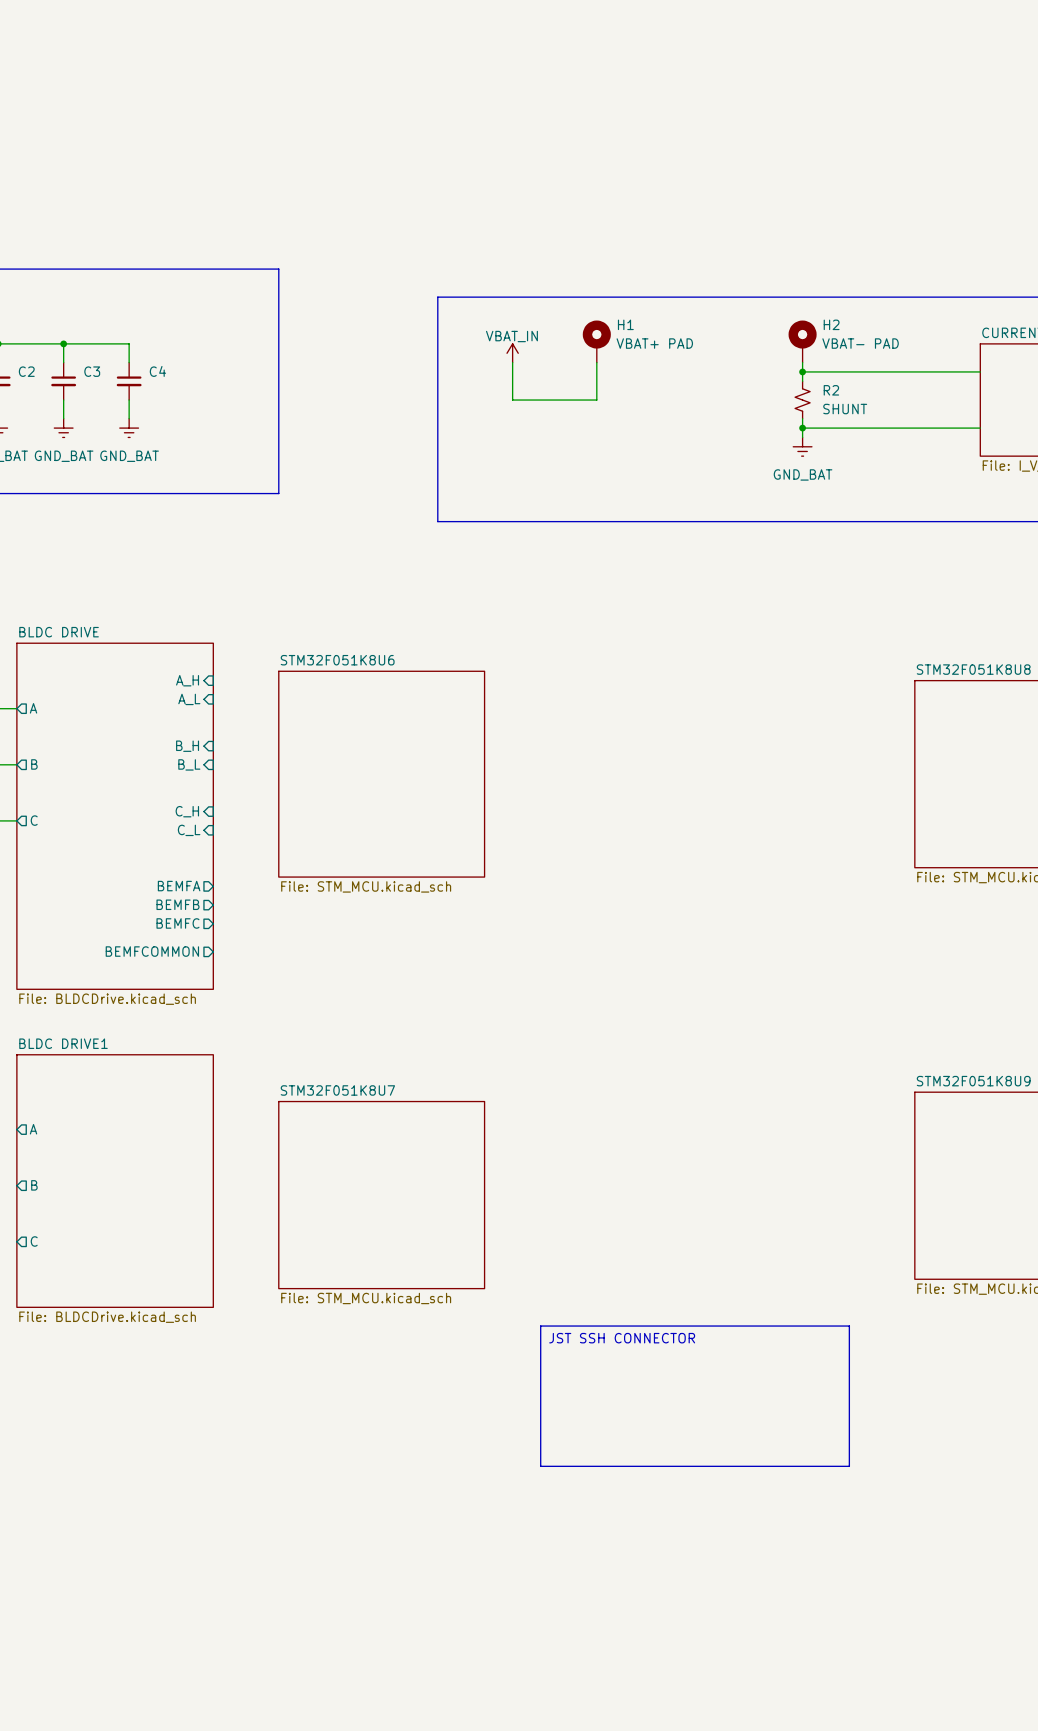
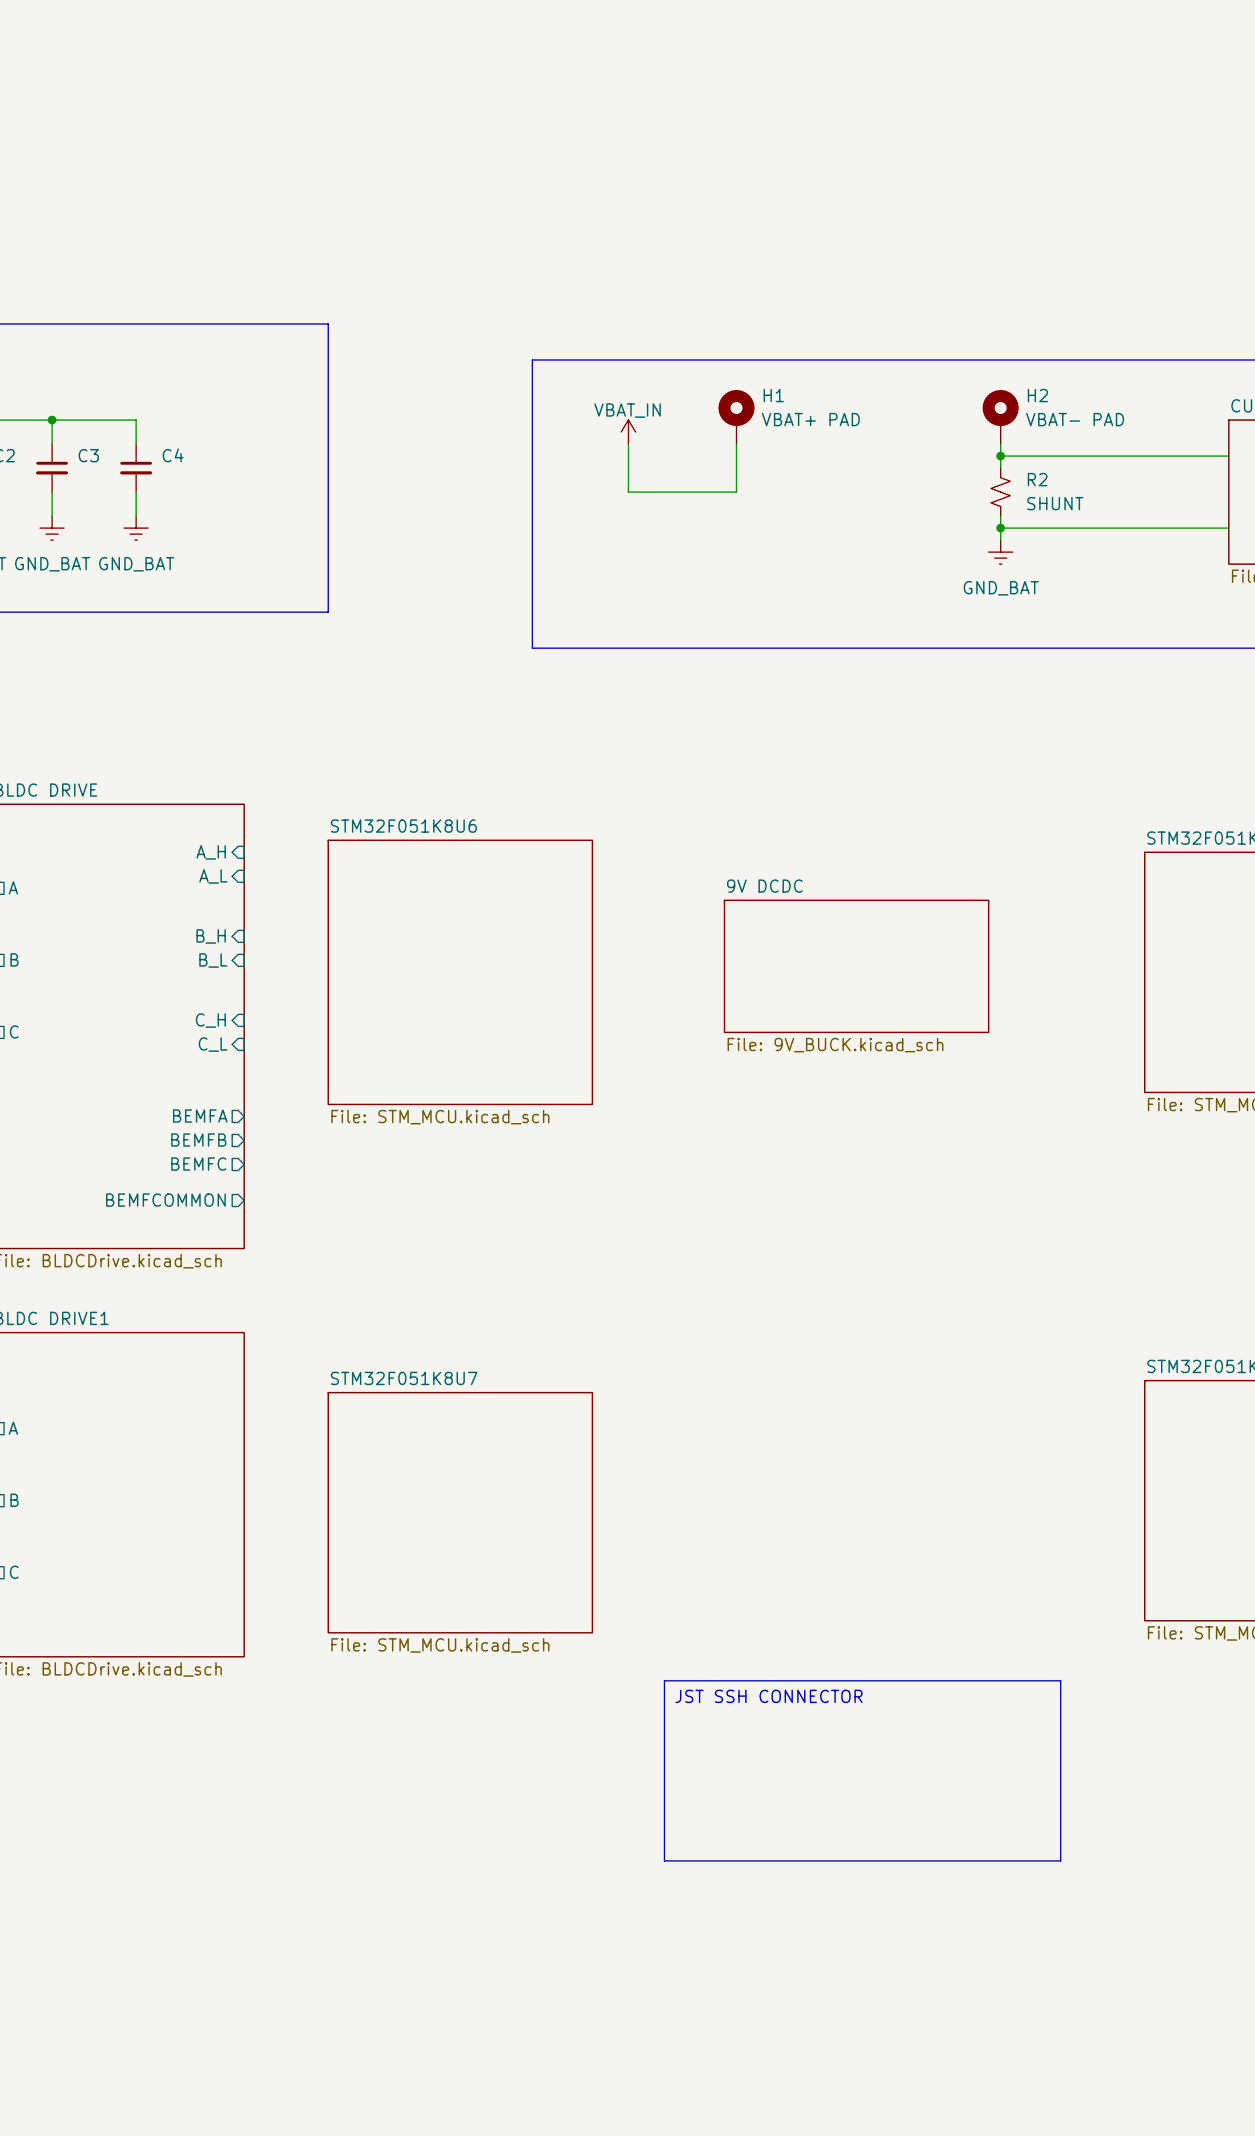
sheet 9V DCDC: none -> File: 9V_BUCK.kicad_sch (856, 966)

